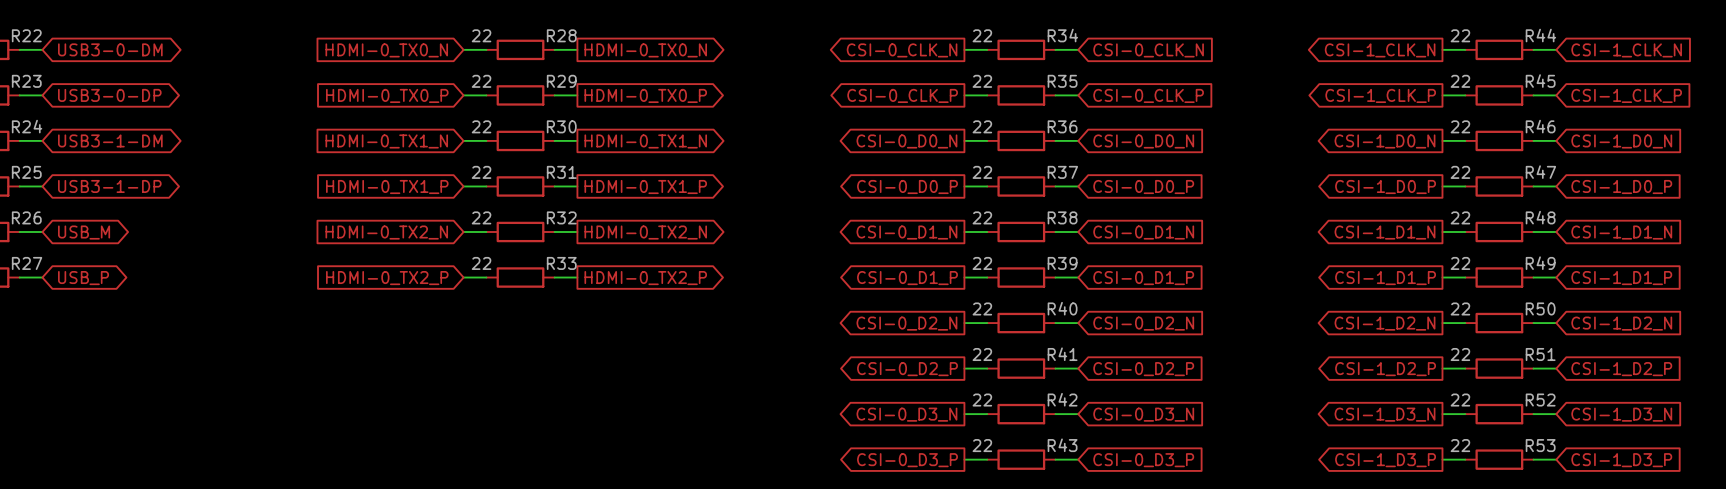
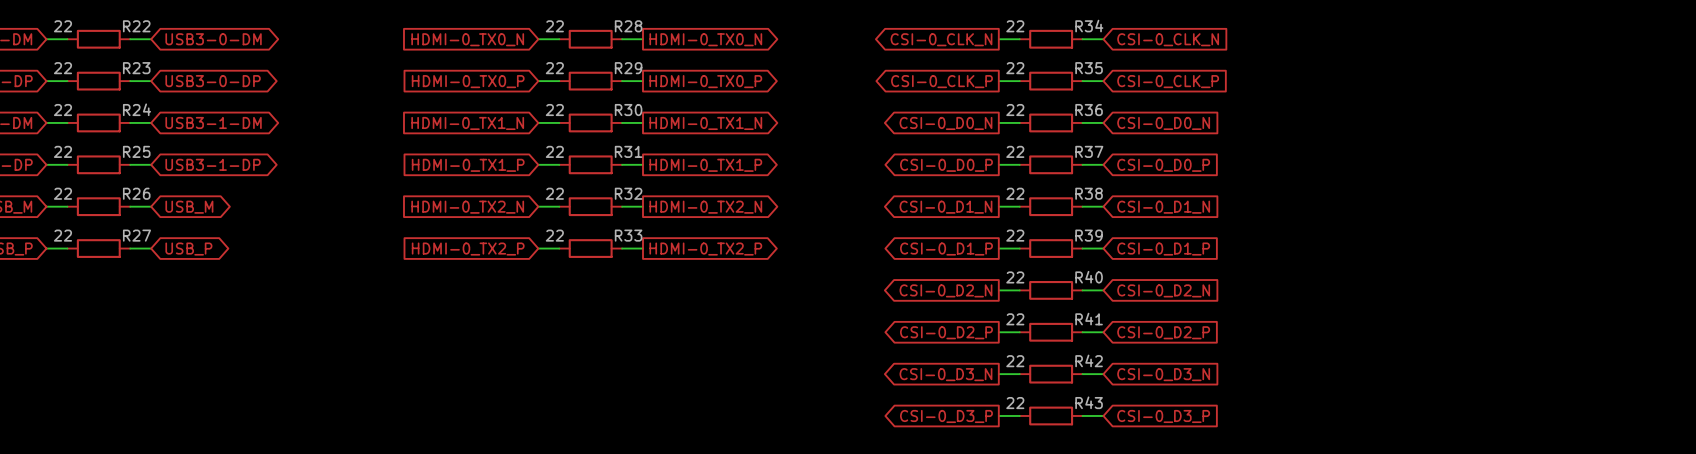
wire: (1442, 49) (1465, 49) -> none
R44: 22 (1499, 49) -> none
wire: (1533, 49) (1556, 49) -> none
global label: CSI-1_CLK_N (1380, 50) -> none
global label: CSI-1_CLK_N (1626, 50) -> none
global label: CSI-1_CLK_P (1380, 95) -> none
wire: (1442, 95) (1465, 95) -> none
R45: 22 (1499, 95) -> none
wire: (1533, 95) (1556, 95) -> none
global label: CSI-1_CLK_P (1626, 95) -> none
wire: (1442, 140) (1465, 140) -> none
R46: 22 (1499, 140) -> none
wire: (1533, 140) (1556, 140) -> none
global label: CSI-1_D0_N (1385, 141) -> none
global label: CSI-1_D0_N (1621, 141) -> none
wire: (1442, 186) (1465, 186) -> none
R47: 22 (1499, 186) -> none
wire: (1533, 186) (1556, 186) -> none
global label: CSI-1_D0_P (1385, 187) -> none
global label: CSI-1_D0_P (1621, 187) -> none
wire: (1442, 231) (1465, 231) -> none
R48: 22 (1499, 231) -> none
wire: (1533, 231) (1556, 231) -> none
global label: CSI-1_D1_N (1385, 232) -> none
global label: CSI-1_D1_N (1621, 232) -> none
wire: (1442, 277) (1465, 277) -> none
R49: 22 (1499, 277) -> none
wire: (1533, 277) (1556, 277) -> none
global label: CSI-1_D1_P (1385, 278) -> none
global label: CSI-1_D1_P (1621, 278) -> none
global label: CSI-1_D2_N (1385, 323) -> none
wire: (1442, 323) (1465, 323) -> none
R50: 22 (1499, 323) -> none
wire: (1533, 323) (1556, 323) -> none
global label: CSI-1_D2_N (1621, 323) -> none
wire: (1442, 368) (1465, 368) -> none
R51: 22 (1499, 368) -> none
wire: (1533, 368) (1556, 368) -> none
global label: CSI-1_D2_P (1385, 369) -> none
global label: CSI-1_D2_P (1621, 369) -> none
global label: CSI-1_D3_N (1385, 414) -> none
wire: (1442, 414) (1465, 414) -> none
R52: 22 (1499, 414) -> none
wire: (1533, 414) (1556, 414) -> none
global label: CSI-1_D3_N (1621, 414) -> none
wire: (1442, 459) (1465, 459) -> none
R53: 22 (1499, 459) -> none
wire: (1533, 459) (1556, 459) -> none
global label: CSI-1_D3_P (1385, 460) -> none
global label: CSI-1_D3_P (1621, 460) -> none

